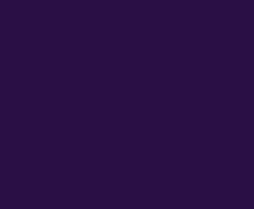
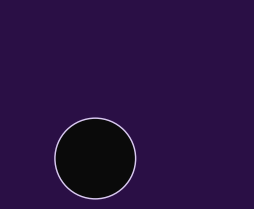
part: none -> (95, 158)

